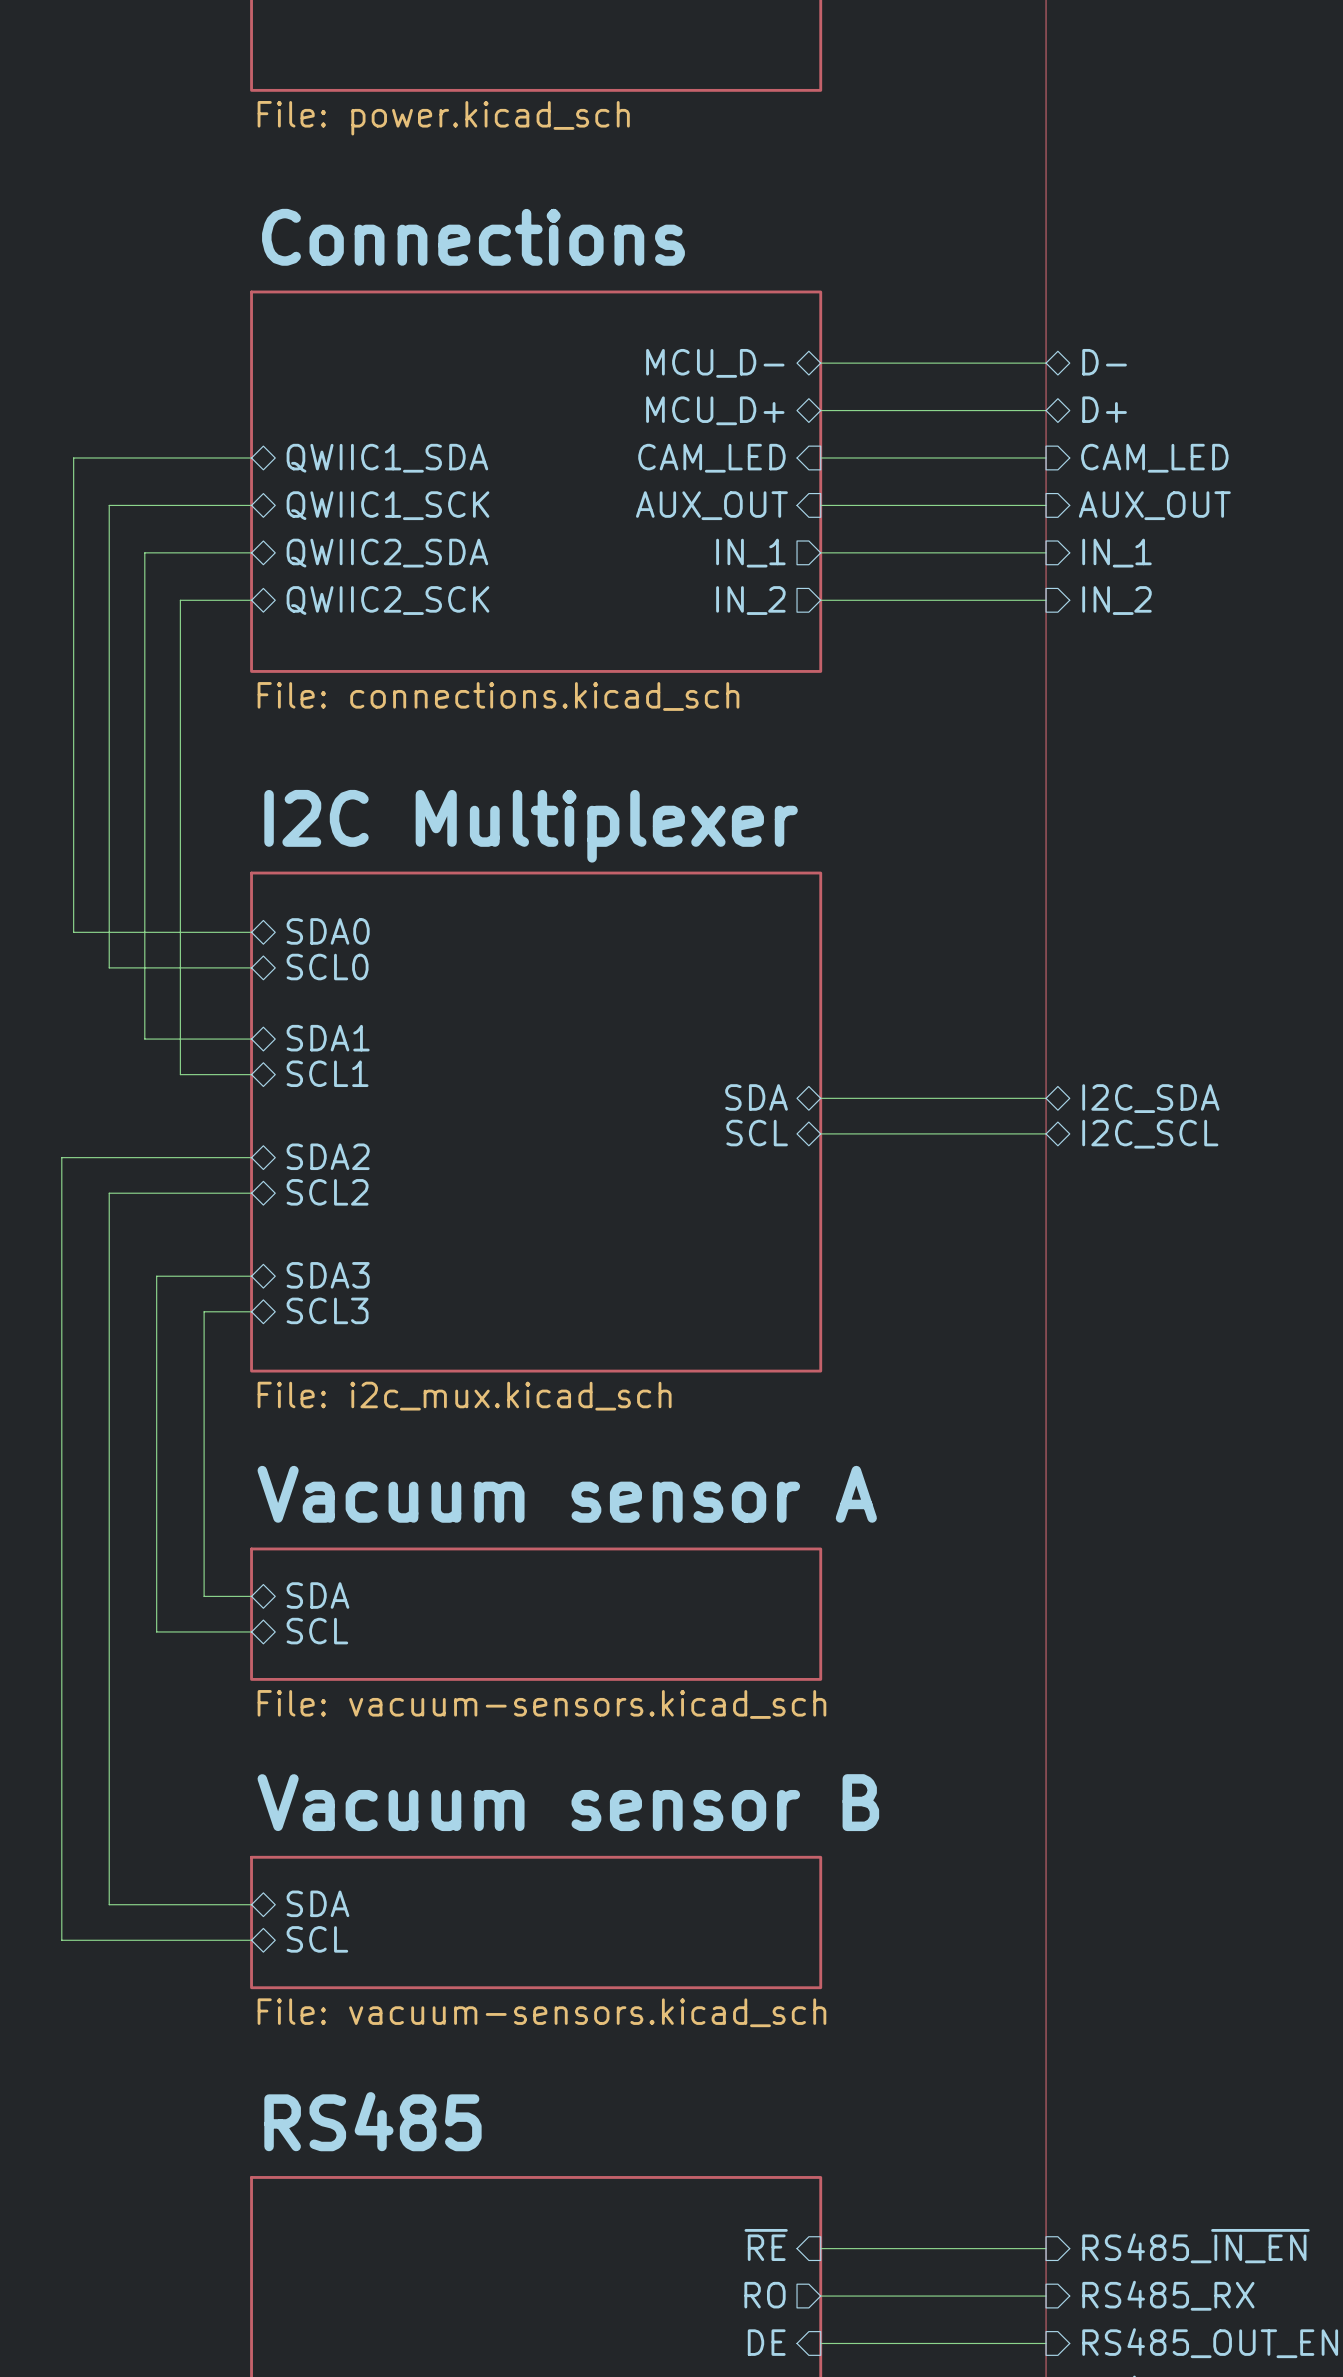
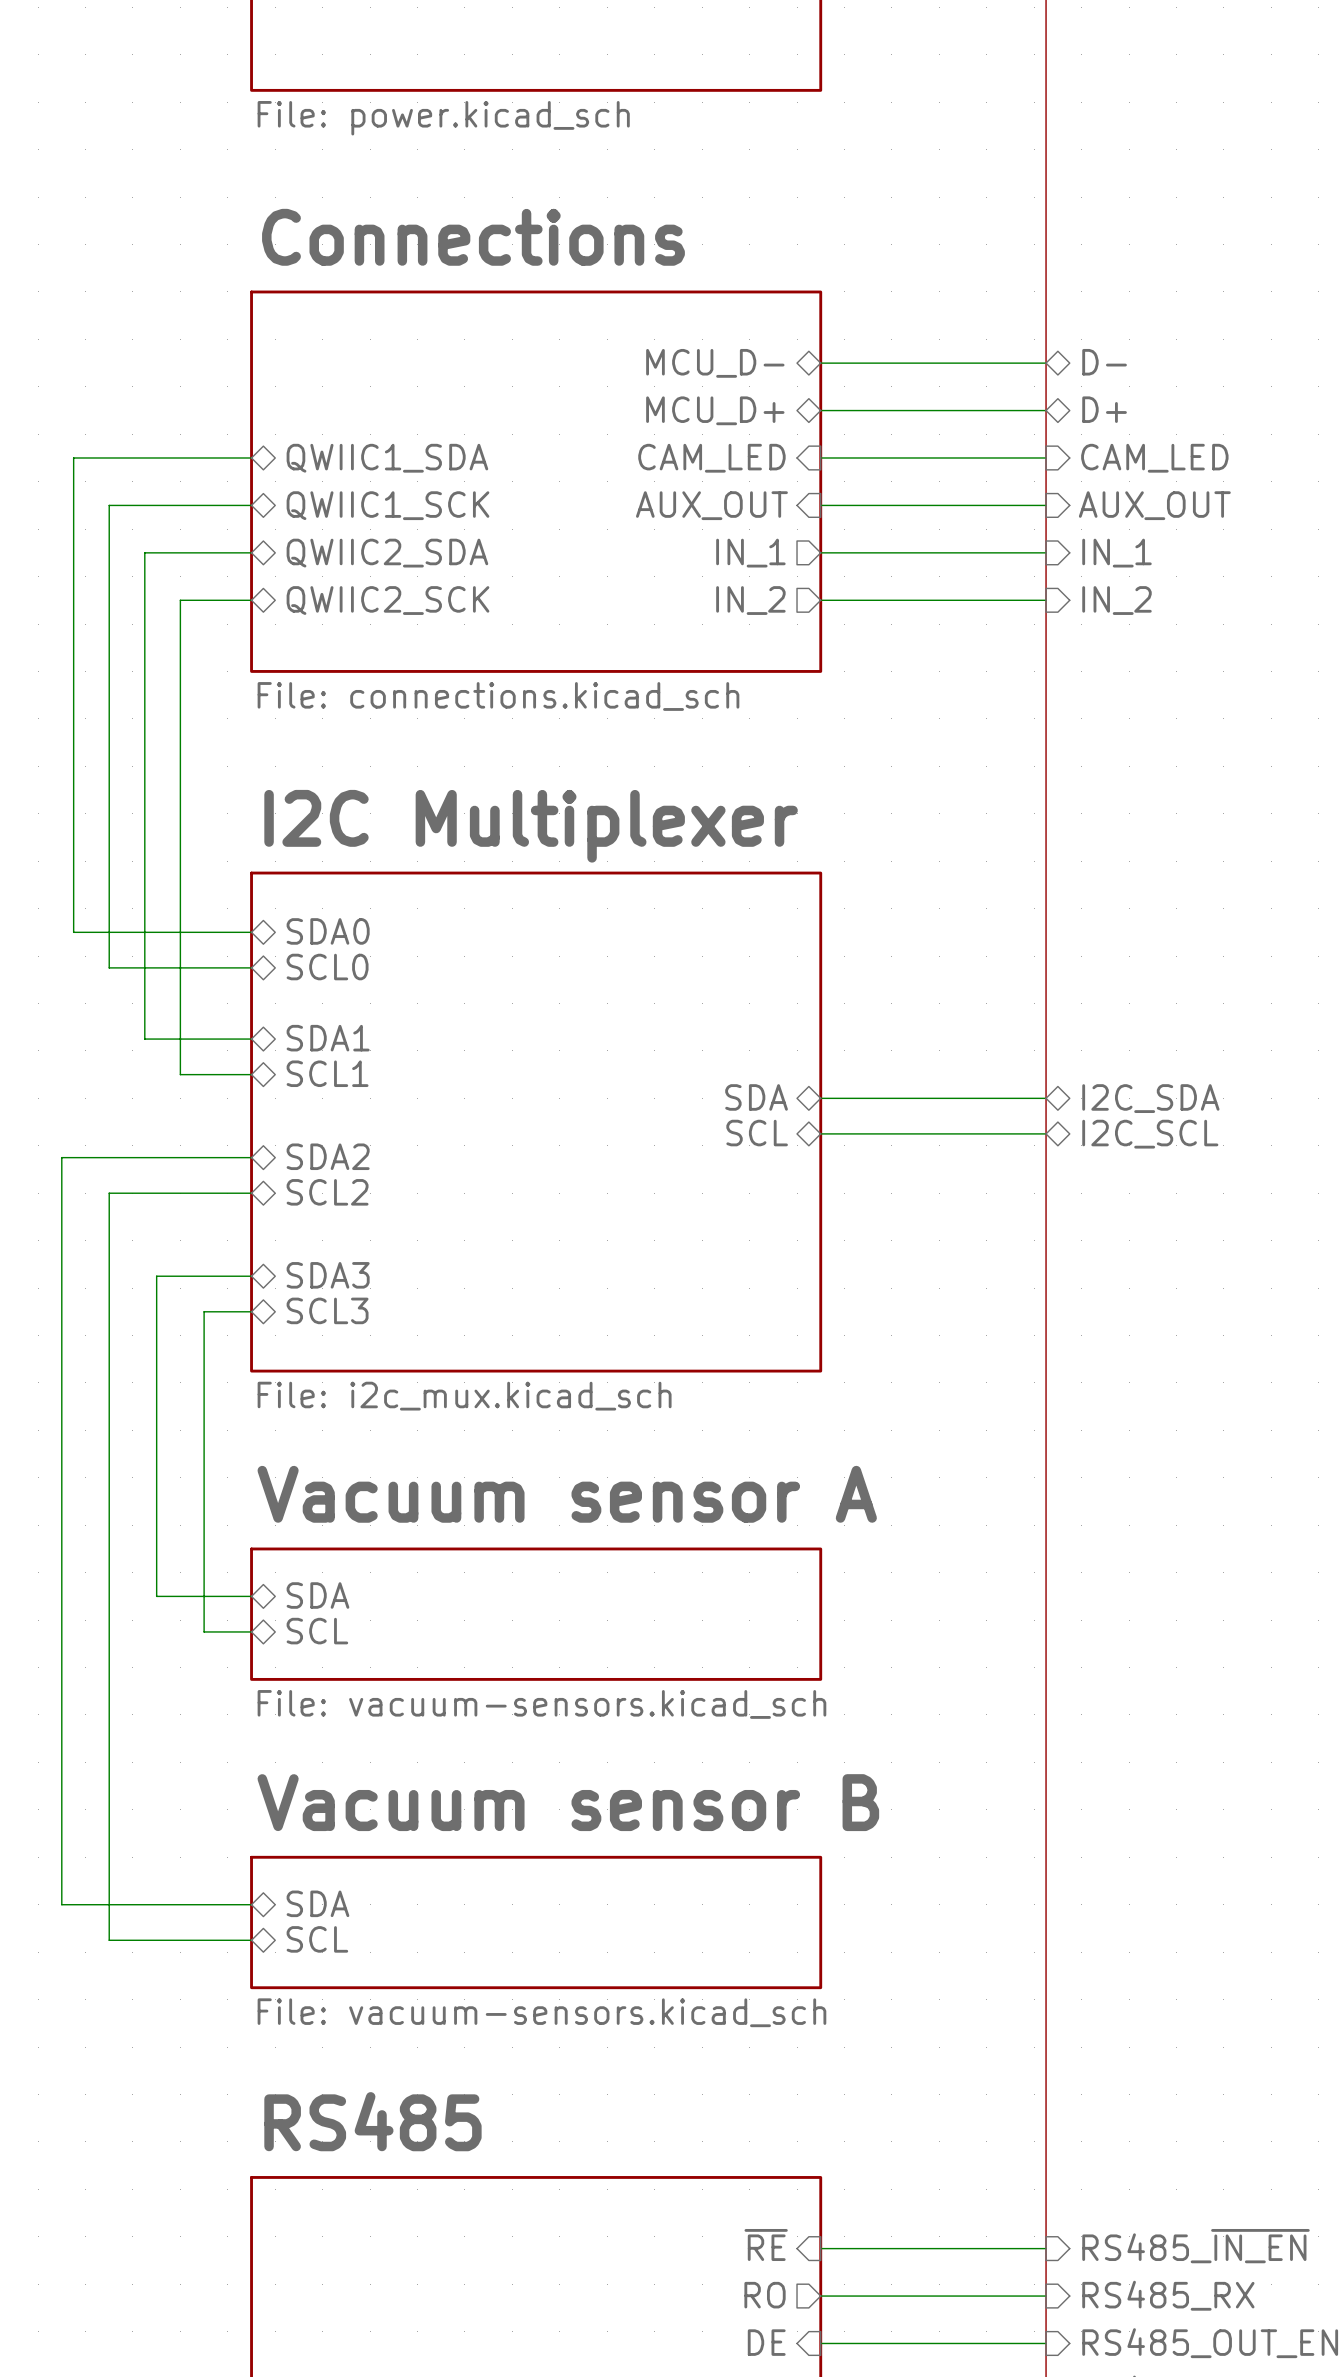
wire: (156, 1596) (156, 1631) (204, 1631) -> (156, 1596) (204, 1596) (204, 1631)
wire: (61, 1904) (61, 1940) (109, 1940) -> (61, 1904) (109, 1904) (109, 1940)

